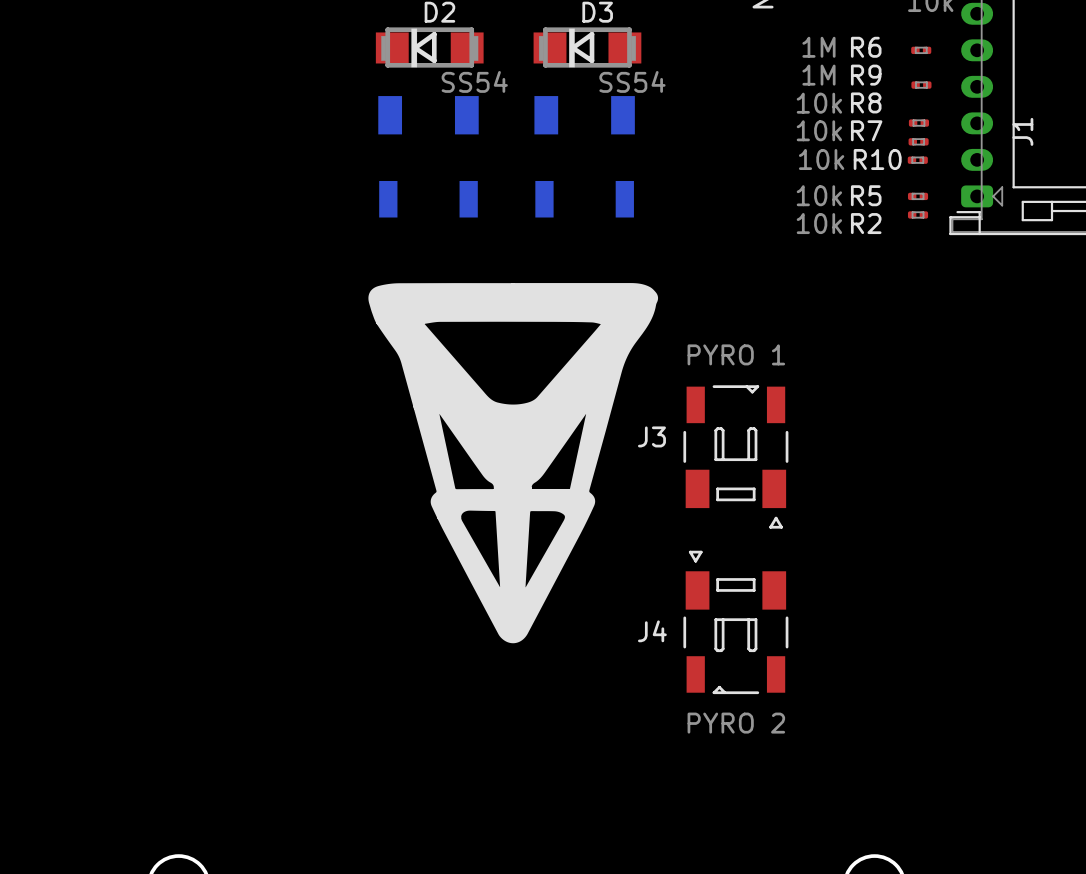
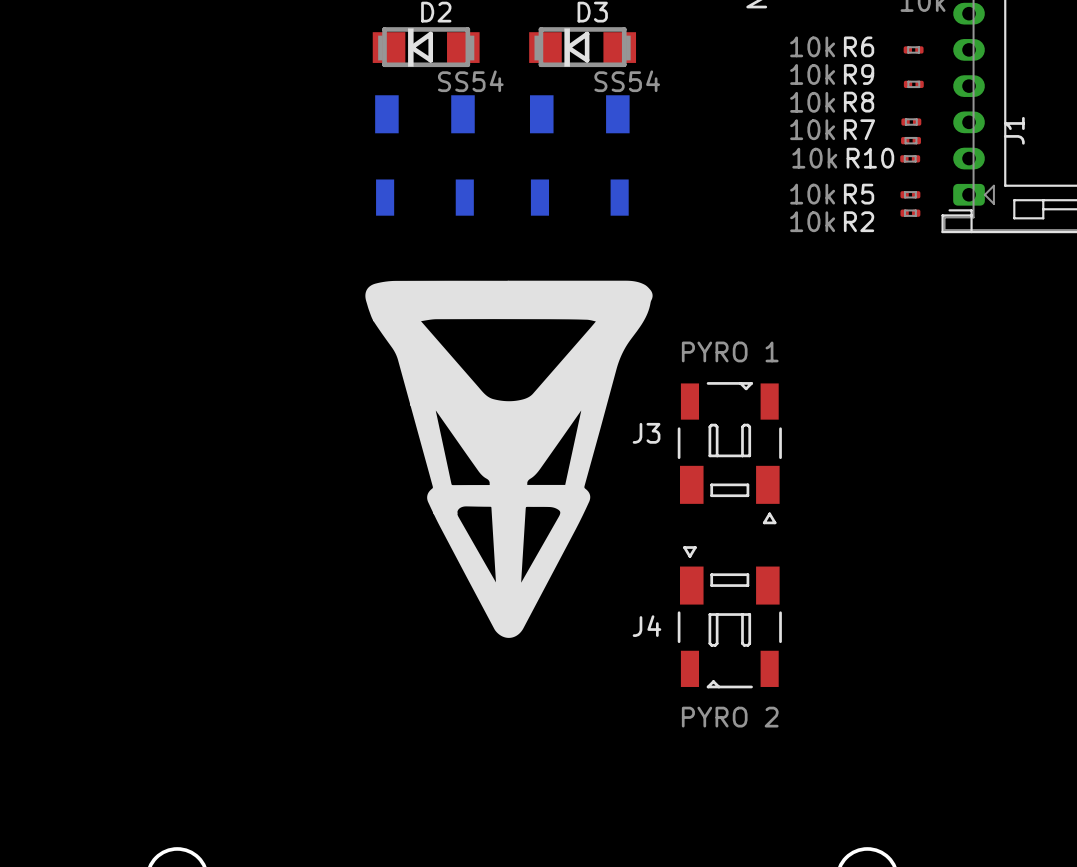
R6 value: 1M (818, 47) -> 10k (812, 46)
R9 value: 1M (818, 75) -> 10k (812, 74)

